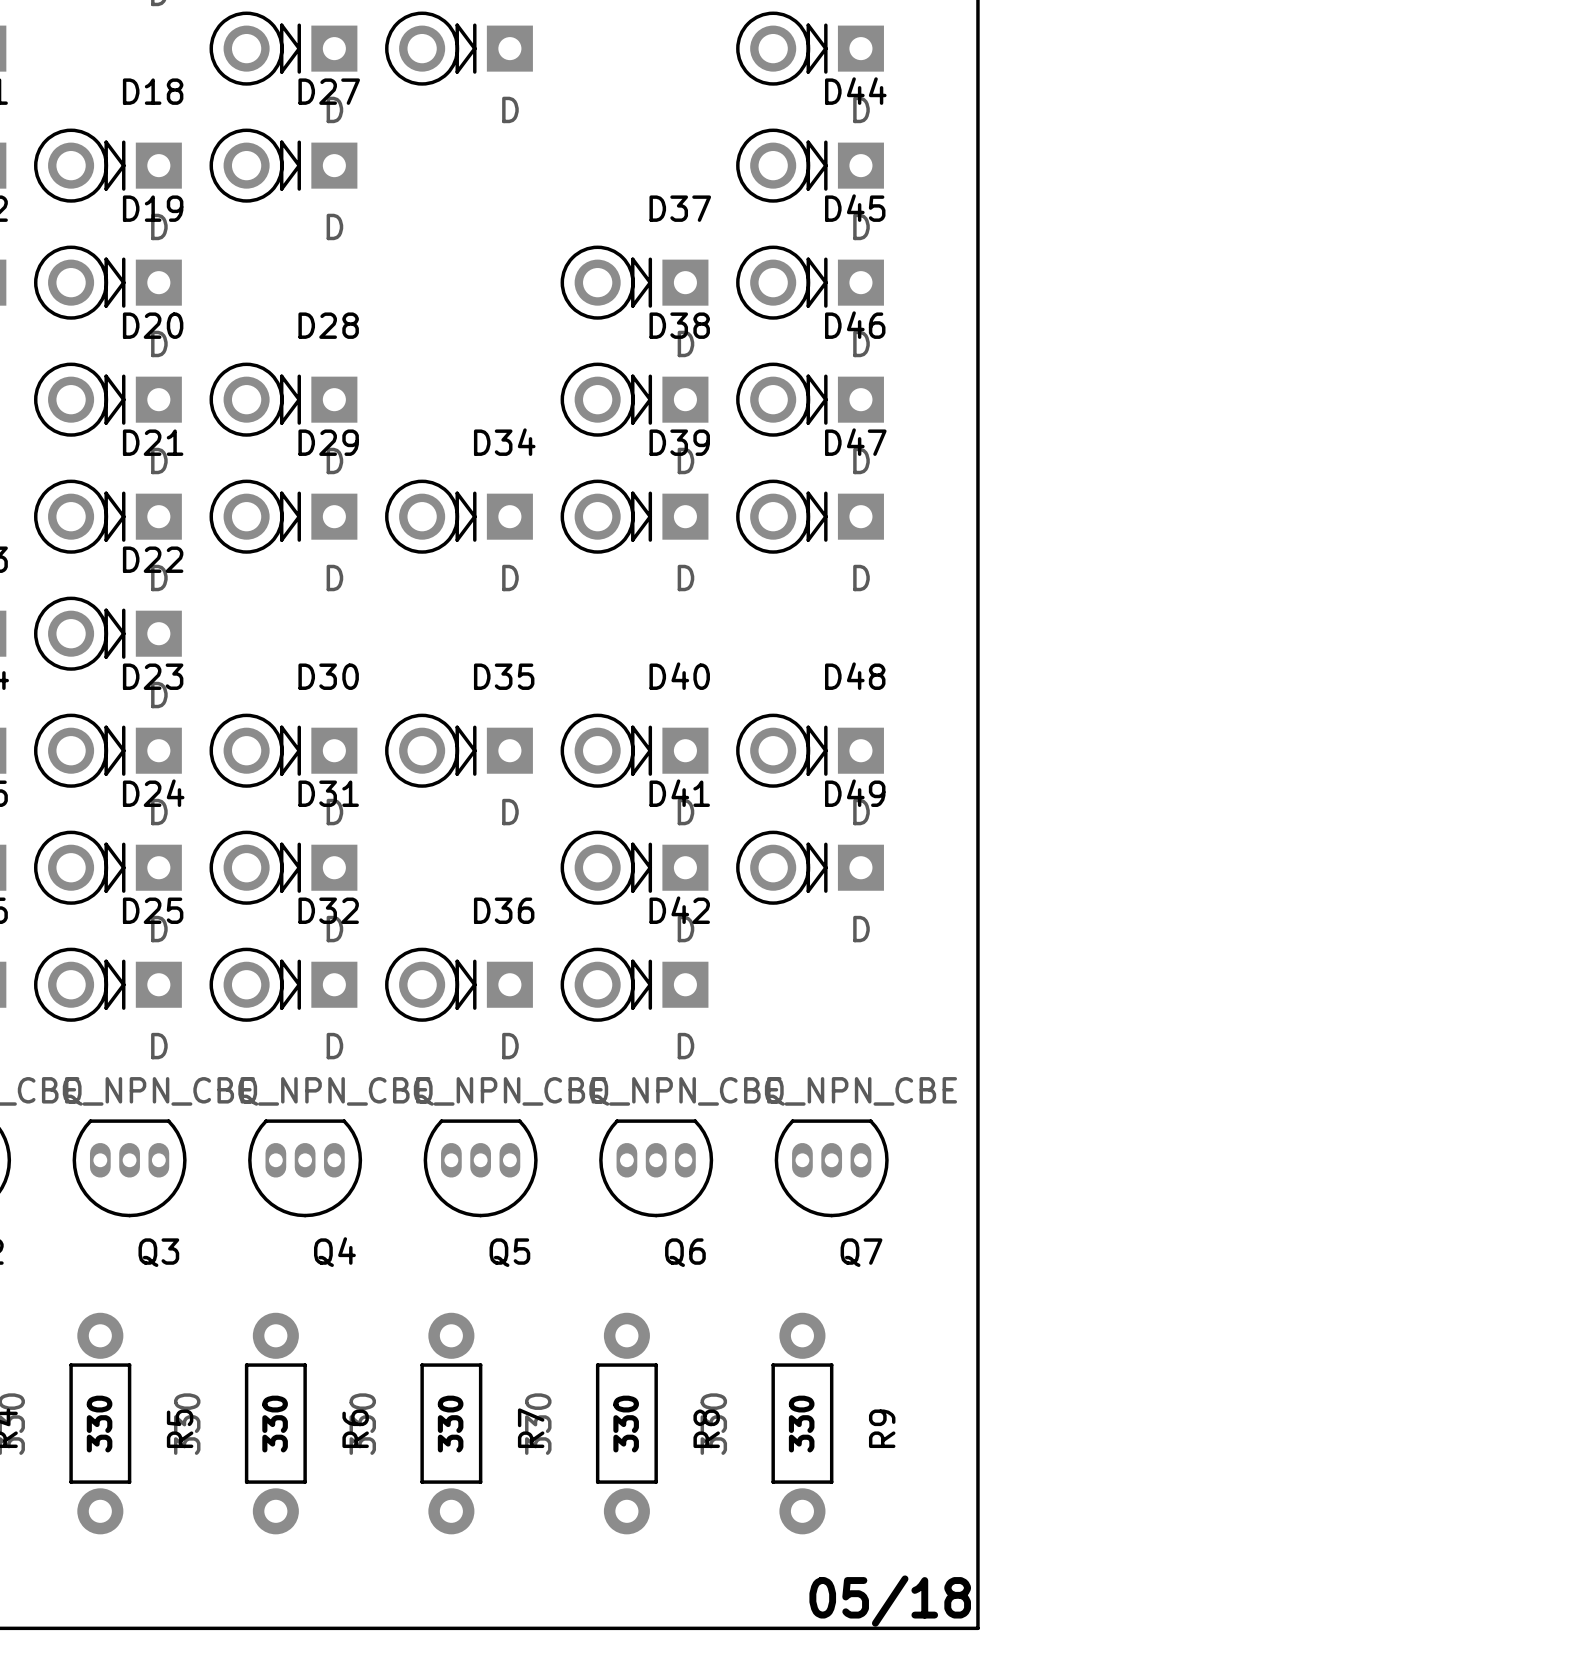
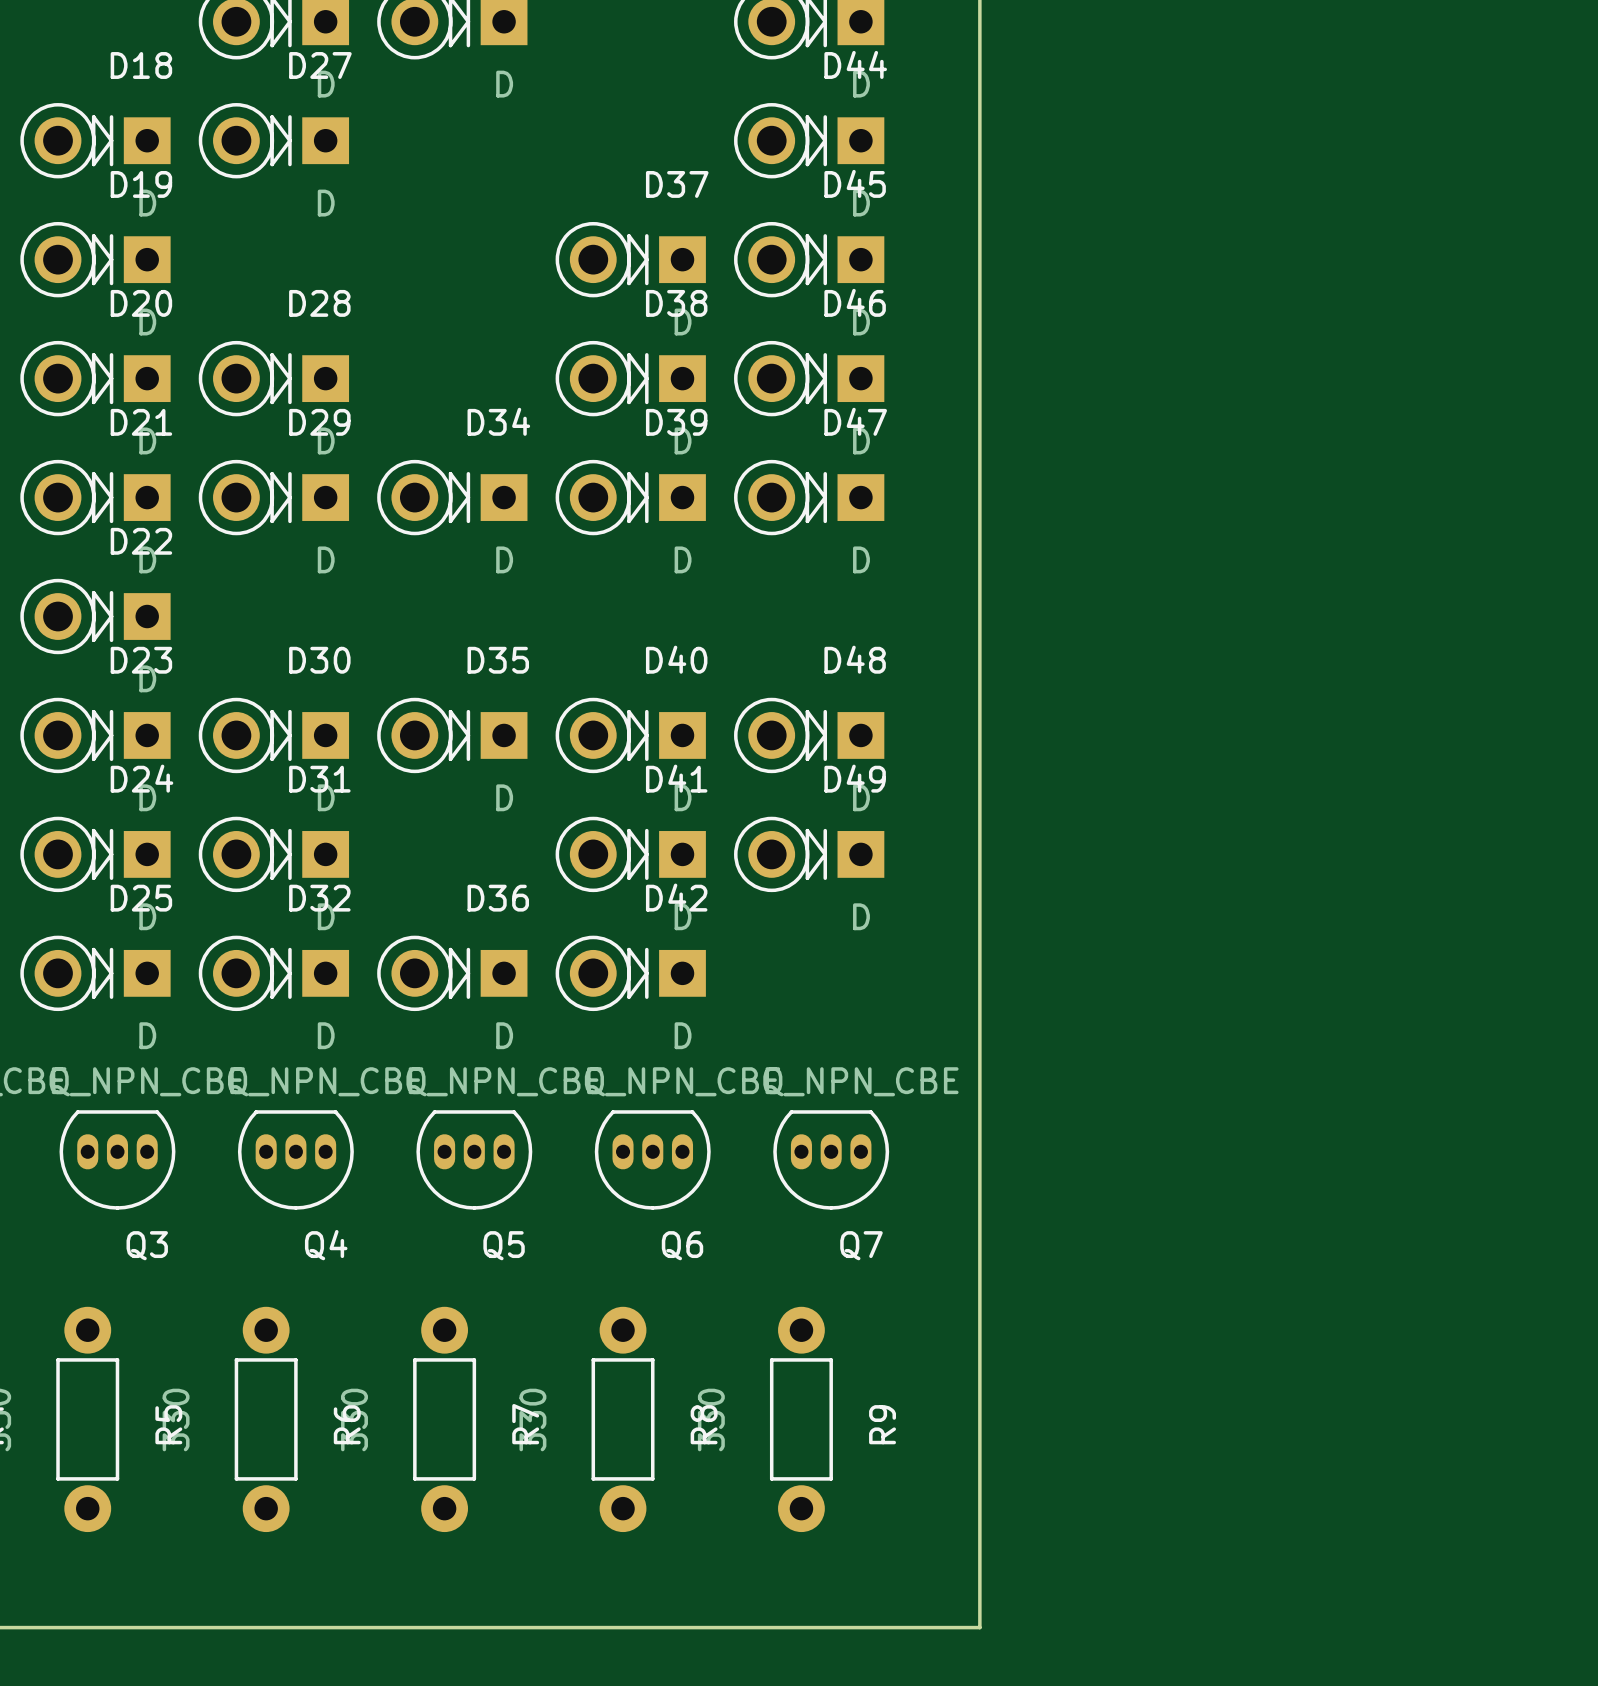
text: 330 (99, 1424) -> none
text: 330 (275, 1424) -> none
text: 330 (450, 1424) -> none
text: 330 (626, 1424) -> none
text: 330 (801, 1424) -> none
text: 05/18 (890, 1601) -> none

